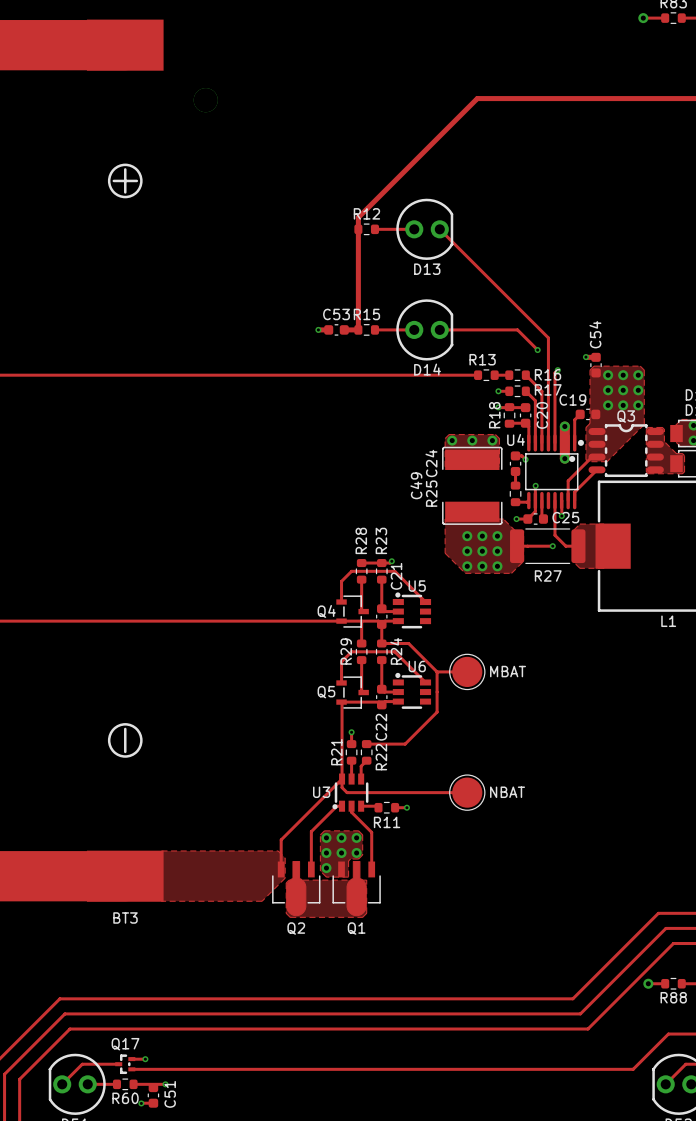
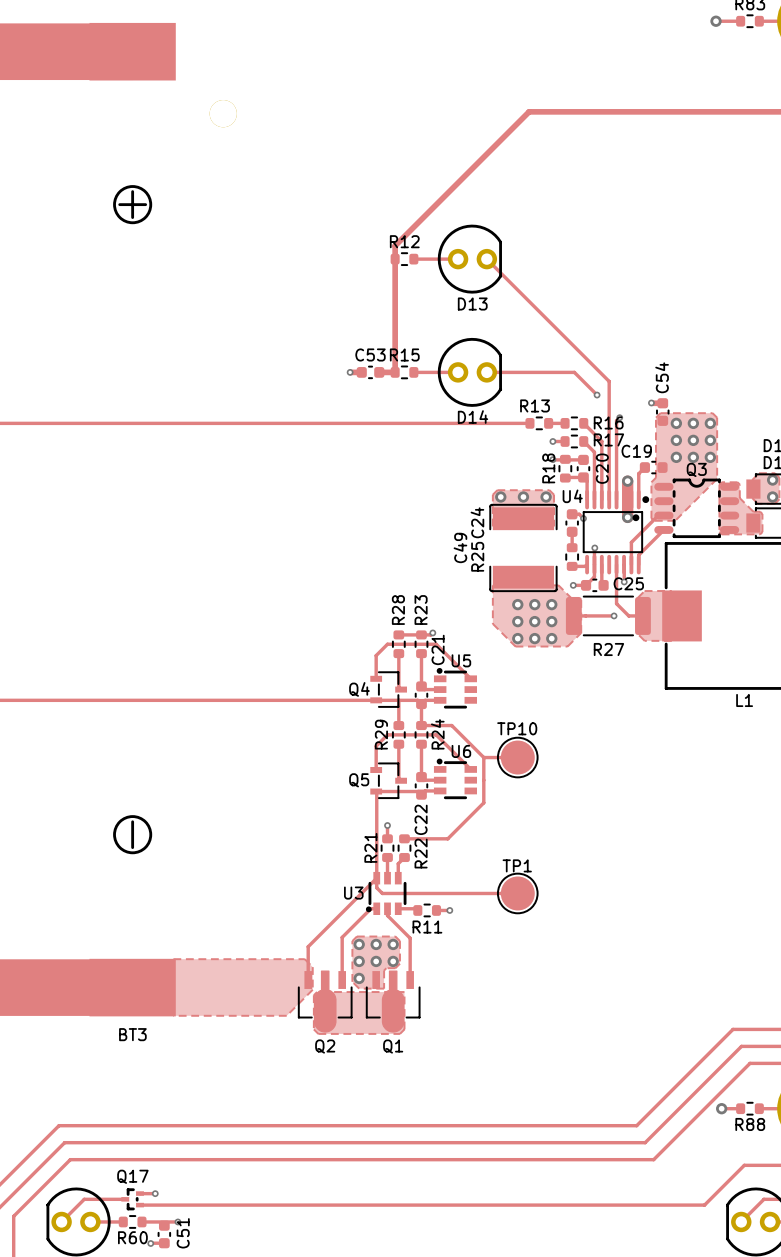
TP10 name: none -> TP10 (517, 728)
text: MBAT (508, 671) -> none
TP1 name: none -> TP1 (517, 865)
text: NBAT (507, 792) -> none

